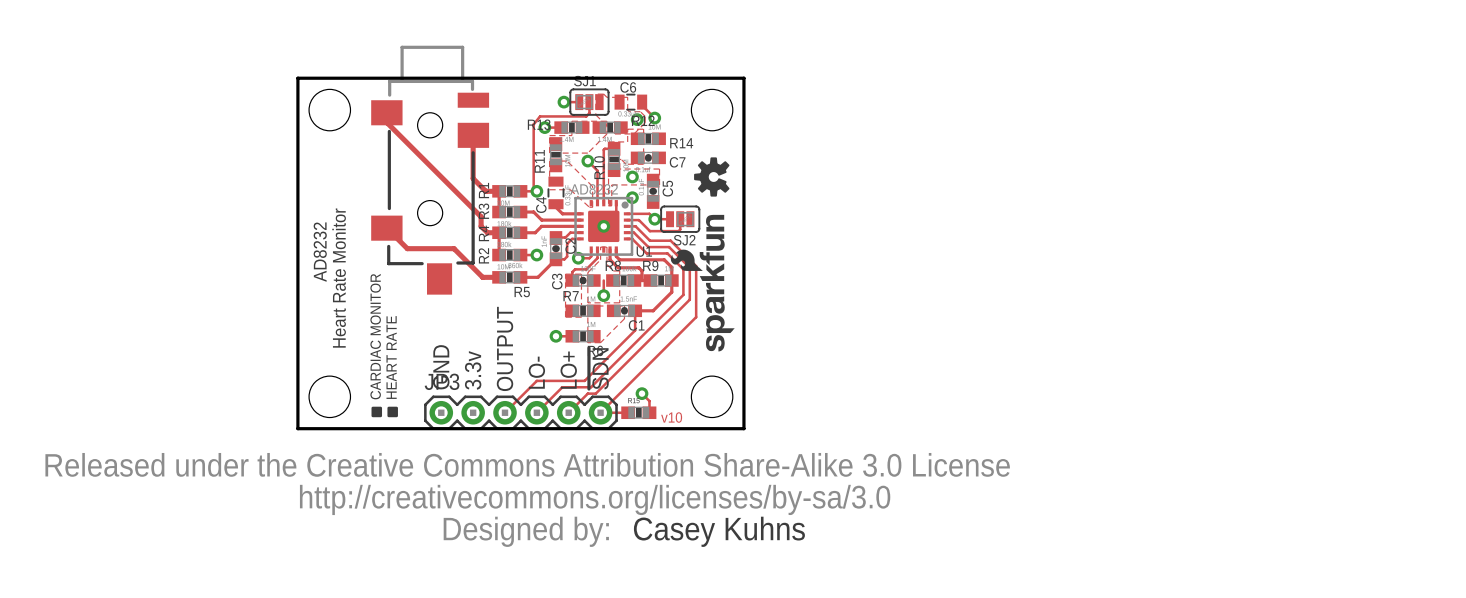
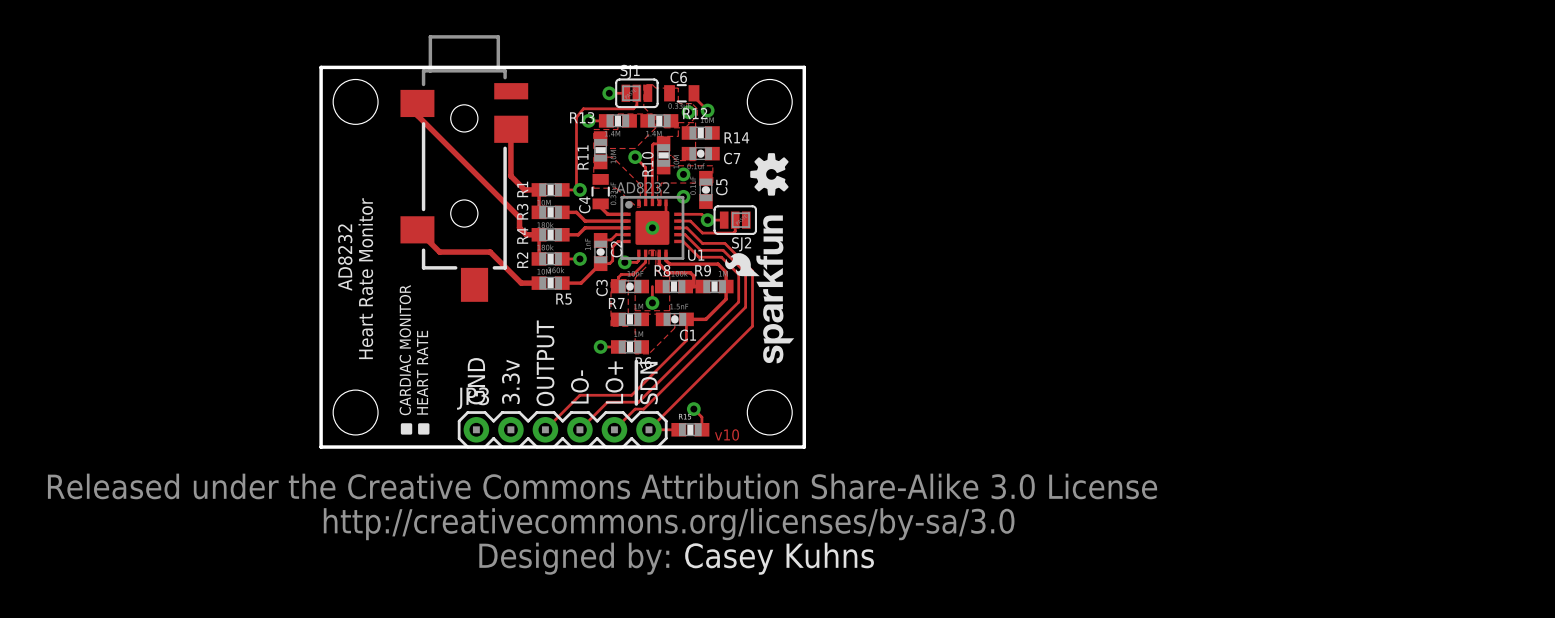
part footprint: [371, 45, 490, 295] -> [400, 35, 529, 302]
U1 footprint: [574, 196, 634, 256] -> [620, 195, 685, 260]

